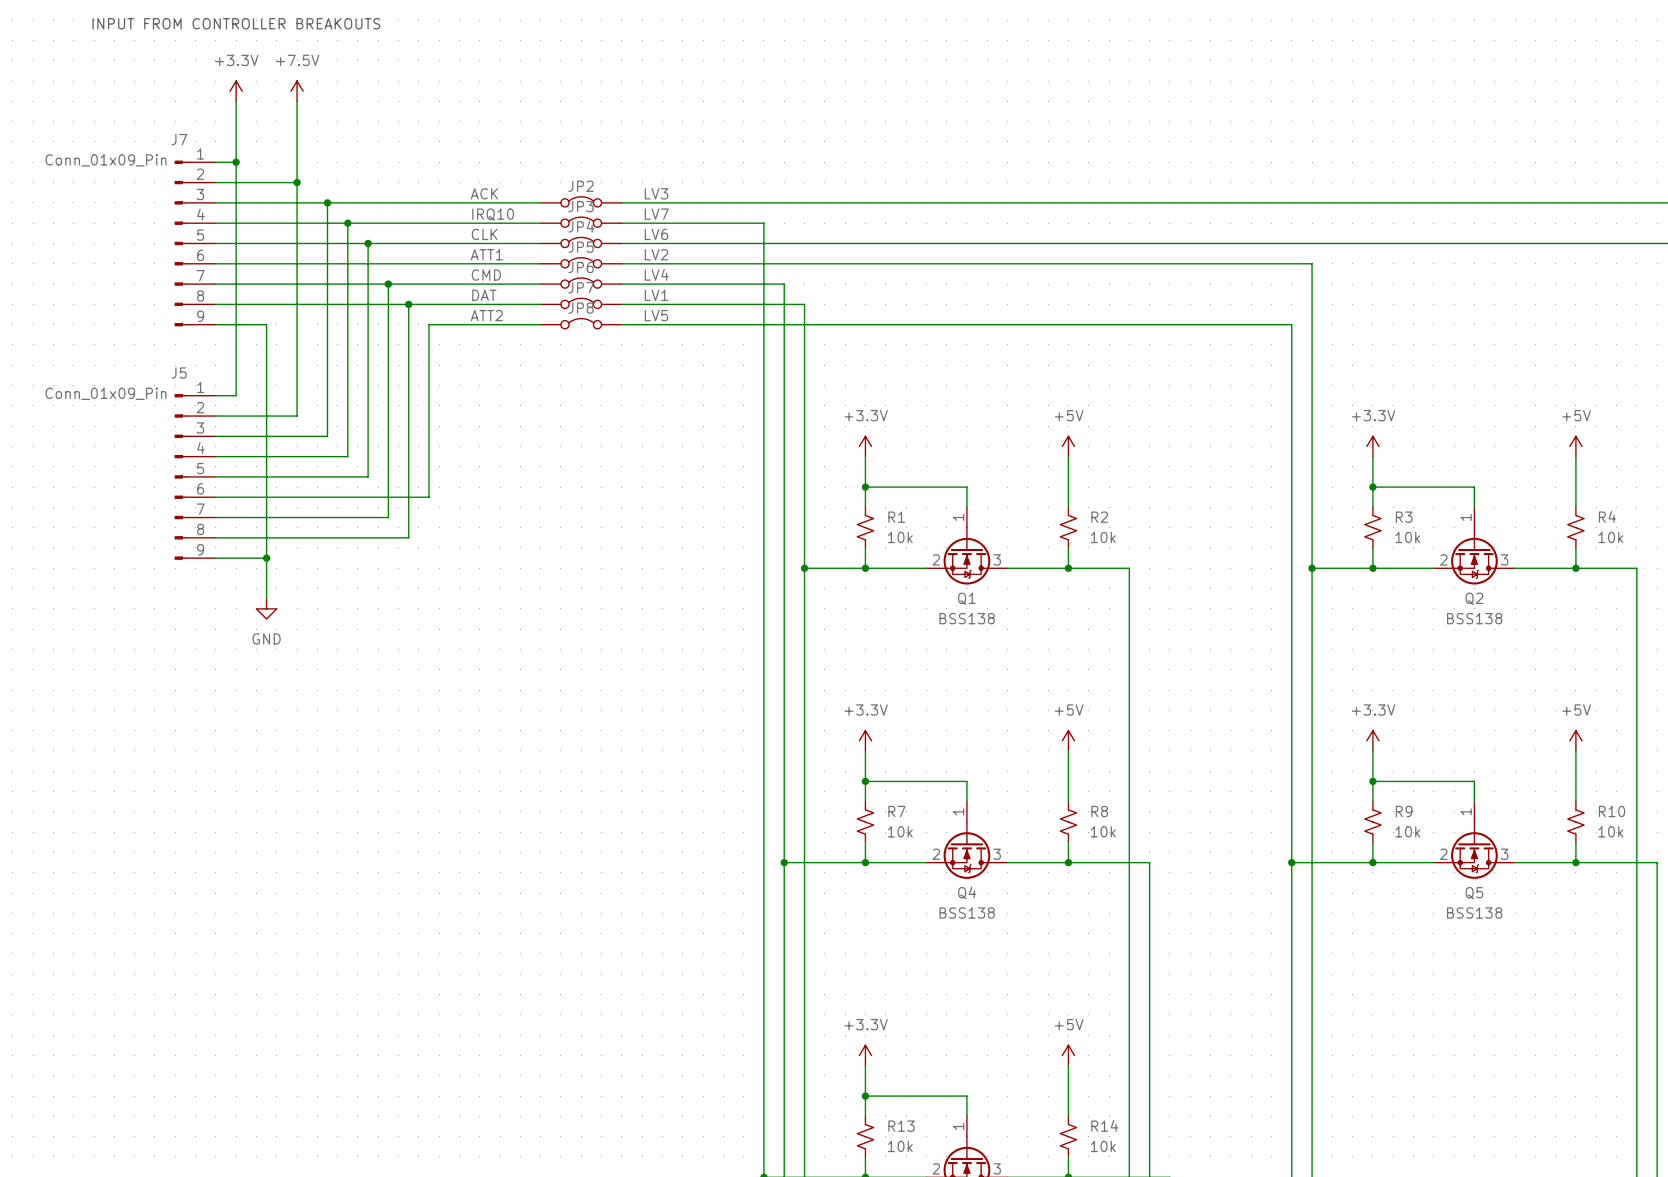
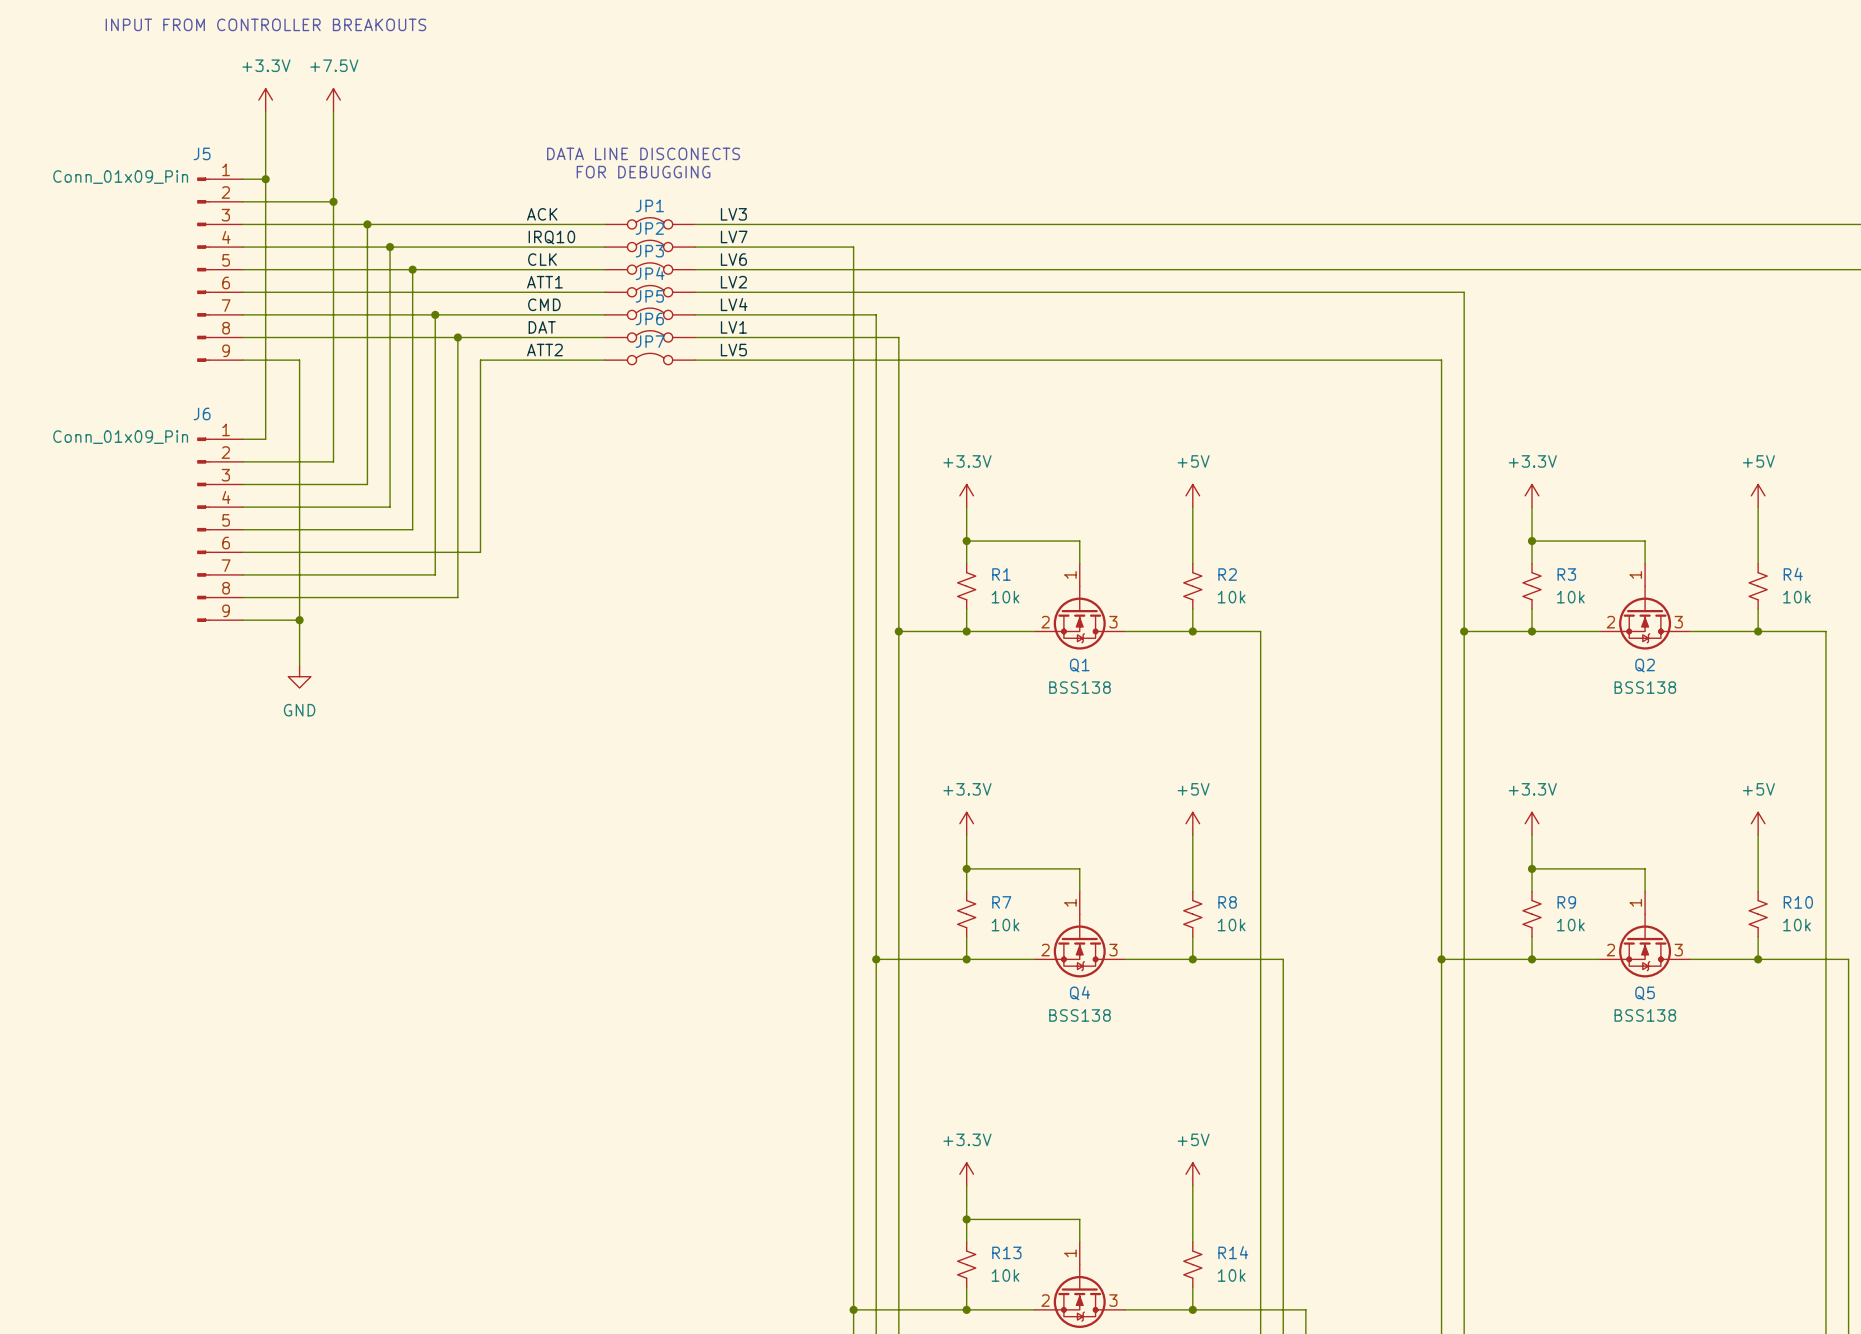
J7 name: J7 (179, 139) -> J5 (202, 153)
text: none -> DATA LINE DISCONECTS (643, 153)
text: none -> FOR DEBUGGING (643, 172)
JP2 name: JP2 (581, 186) -> JP1 (649, 205)
JP3 name: JP3 (581, 206) -> JP2 (649, 228)
JP4 name: JP4 (581, 226) -> JP3 (649, 251)
JP5 name: JP5 (581, 247) -> JP4 (650, 273)
JP6 name: JP6 (581, 267) -> JP5 (649, 296)
JP7 name: JP7 (581, 287) -> JP6 (649, 318)
JP8 name: JP8 (581, 308) -> JP7 (650, 341)
J5 name: J5 (179, 373) -> J6 (202, 413)

